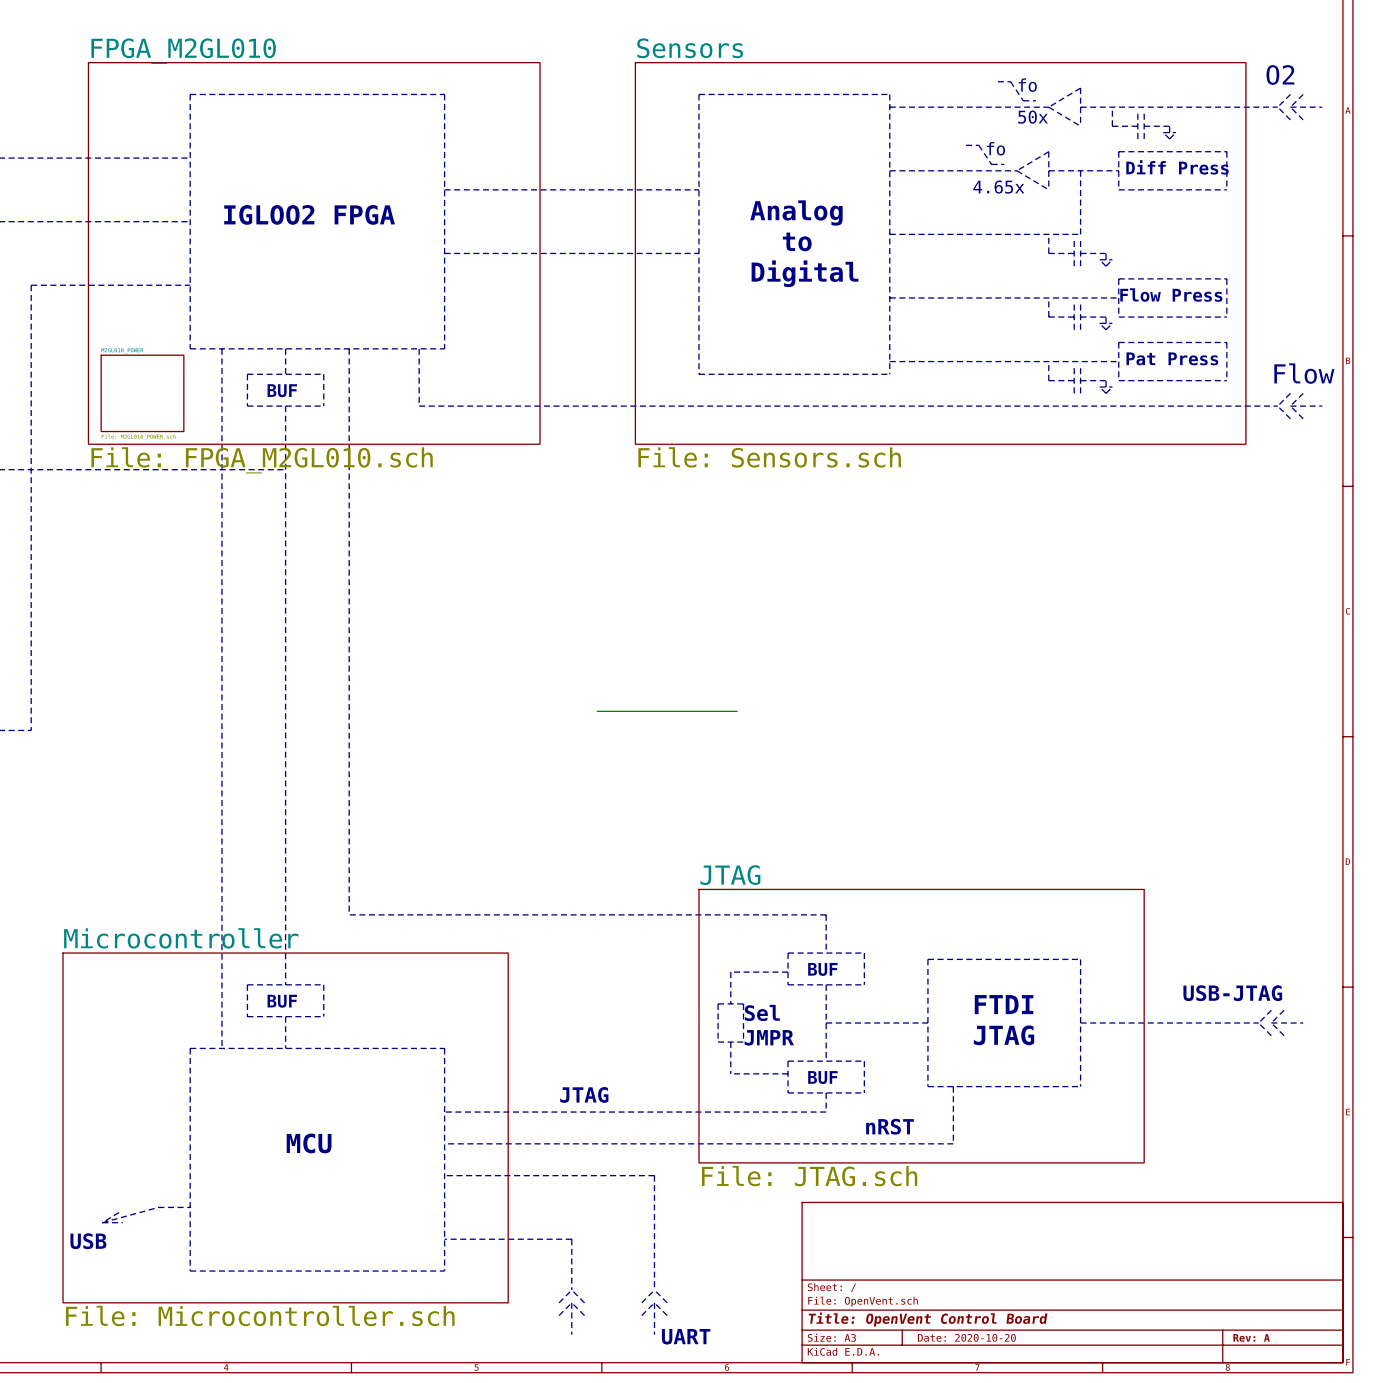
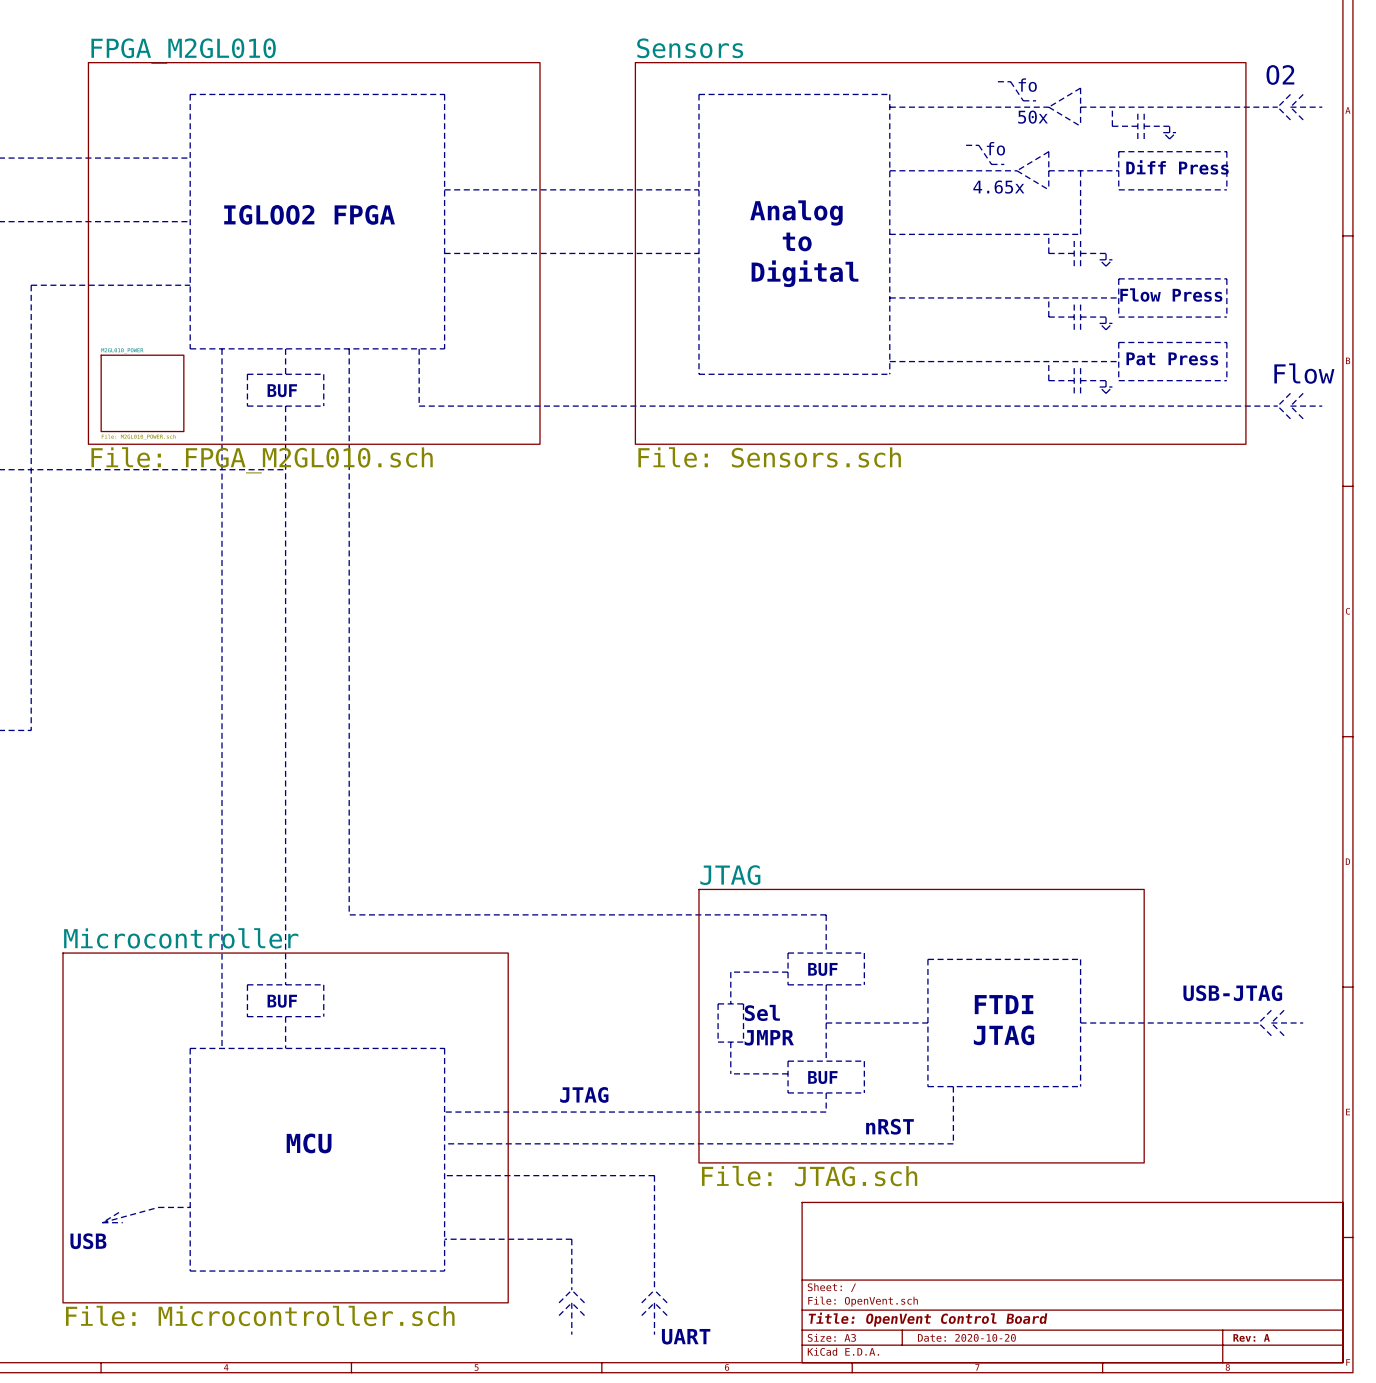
wire: (597, 711) (737, 711) -> none

